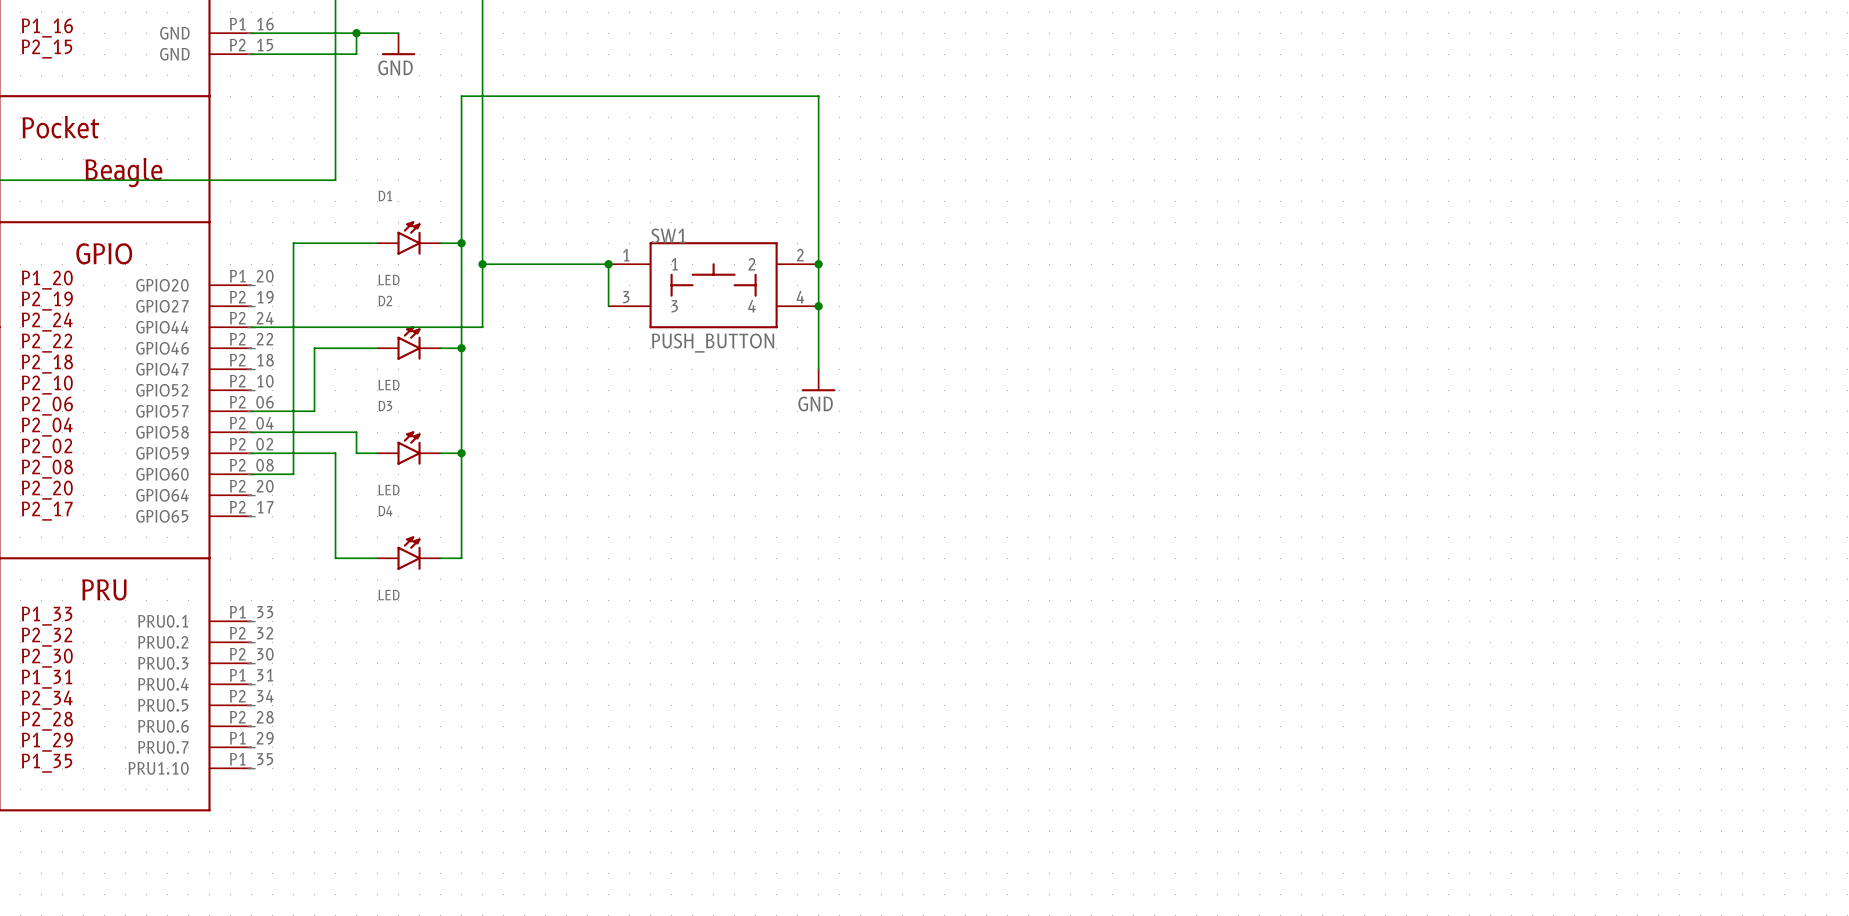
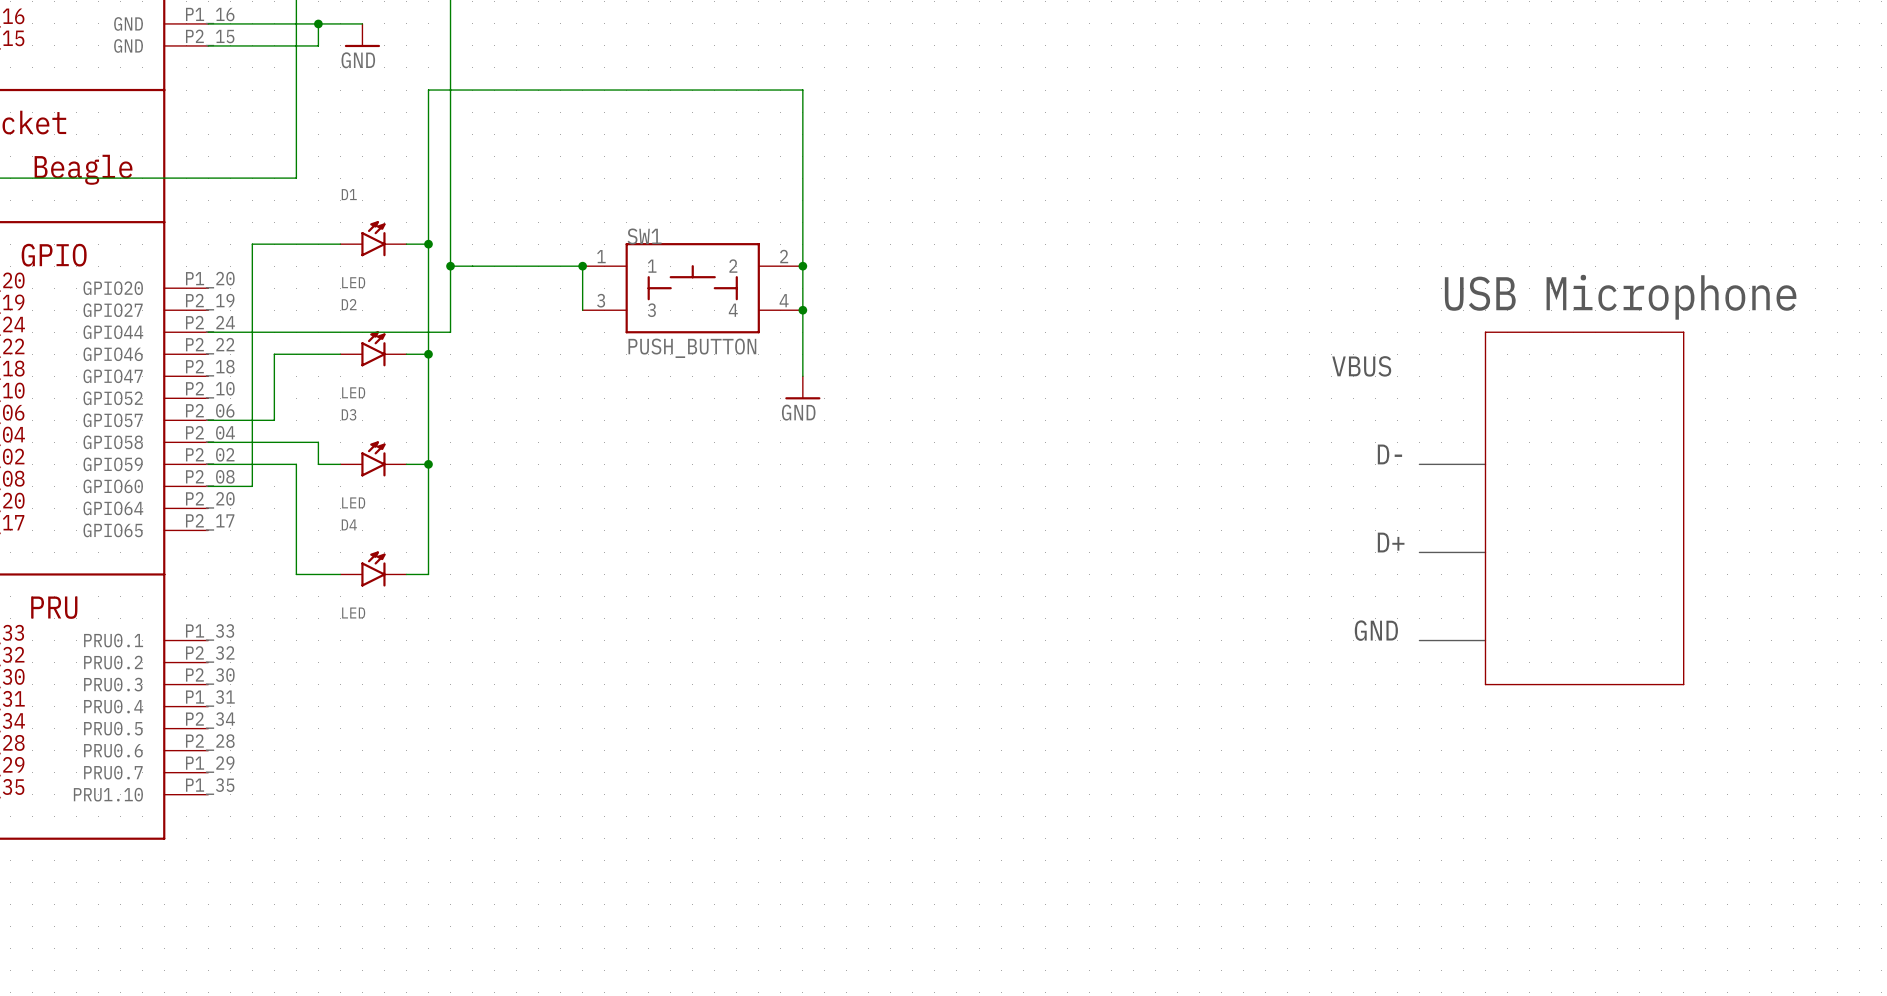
text: none -> USB Microphone (1620, 297)
line: none -> (1485, 332) (1485, 684) (1683, 684) (1683, 332) (1485, 332)
text: none -> VBUS (1361, 366)
text: none -> D- (1389, 454)
line: none -> (1419, 464) (1485, 464)
text: none -> D+ (1391, 542)
line: none -> (1419, 552) (1485, 552)
text: none -> GND (1376, 630)
line: none -> (1419, 640) (1485, 640)

